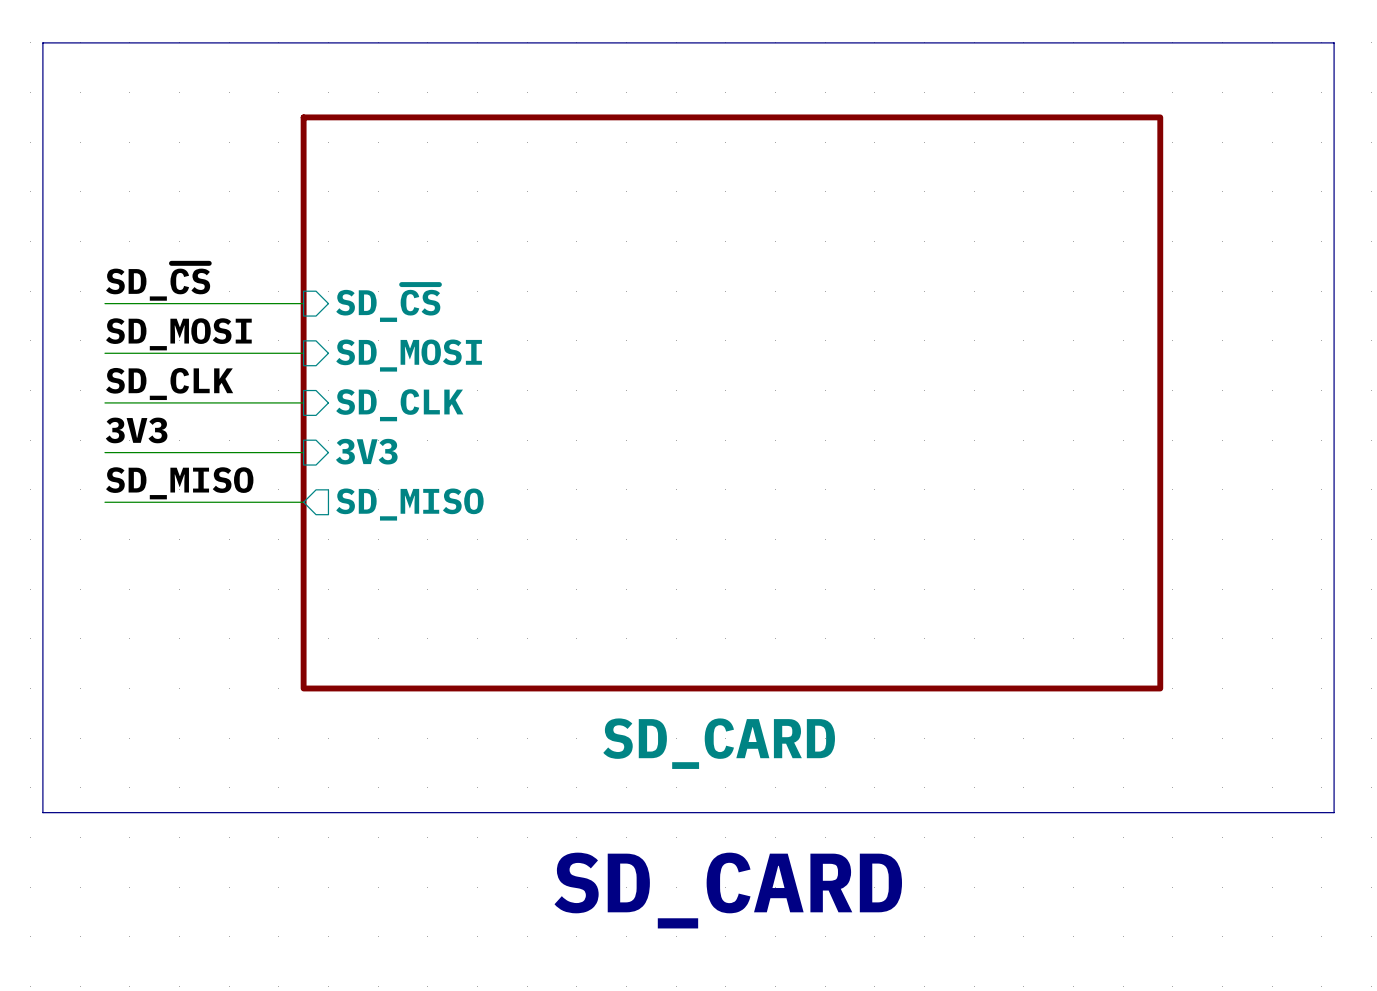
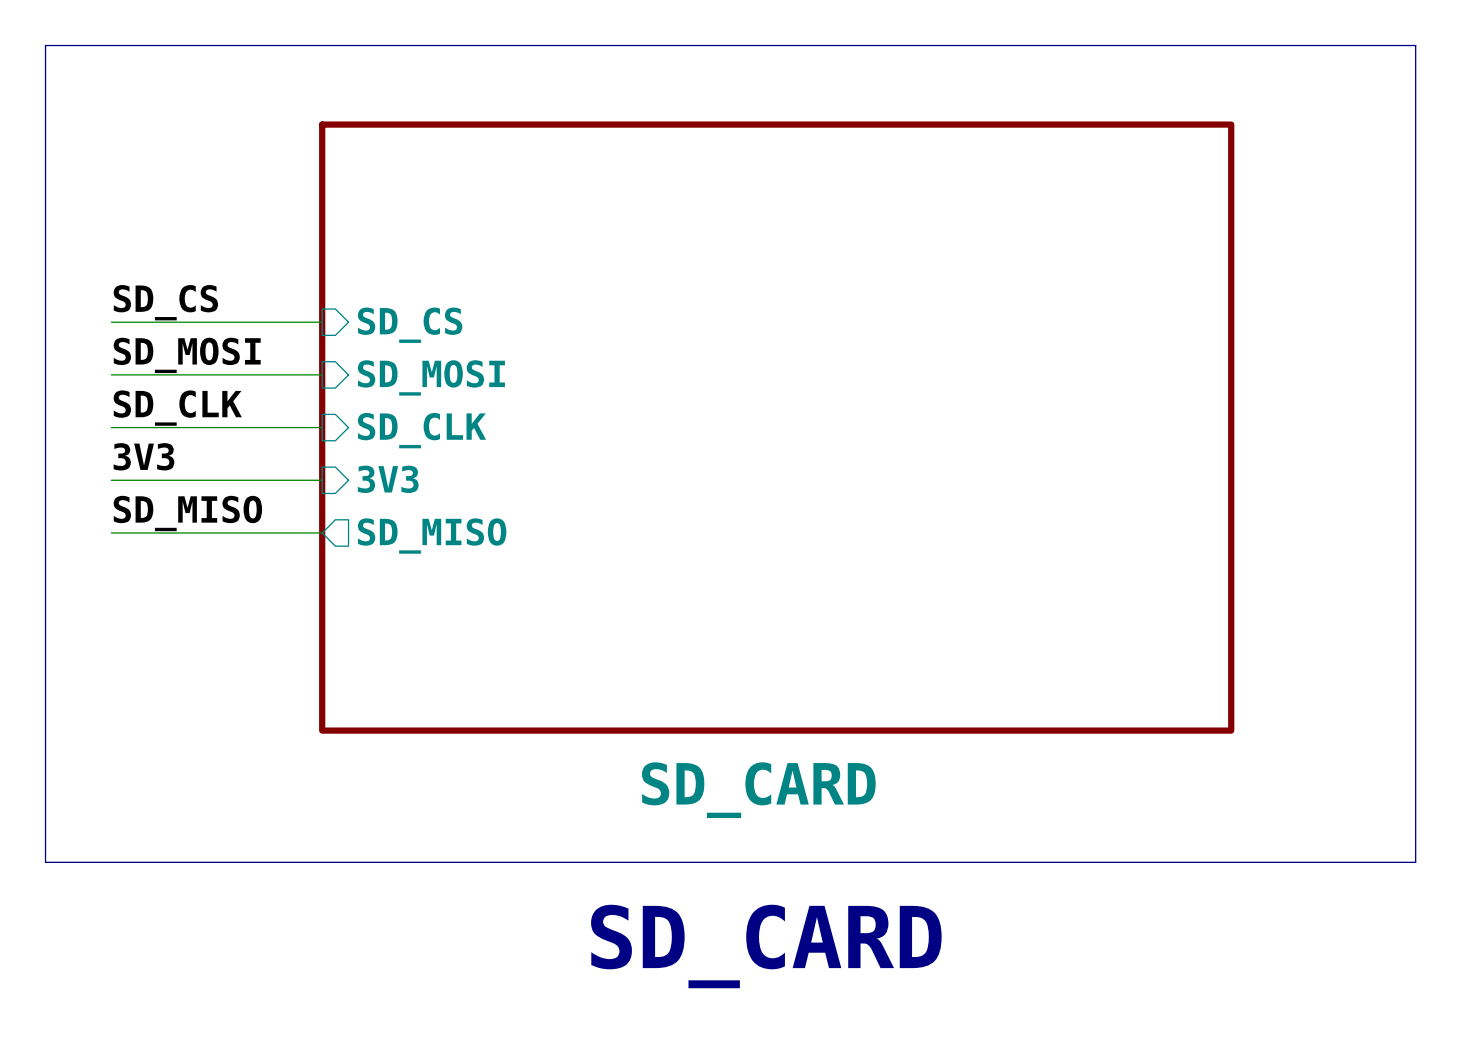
label: SD_~{CS} (158, 282) -> SD_CS (165, 302)
sheet pin: SD_~{CS} (388, 303) -> SD_CS (410, 325)

